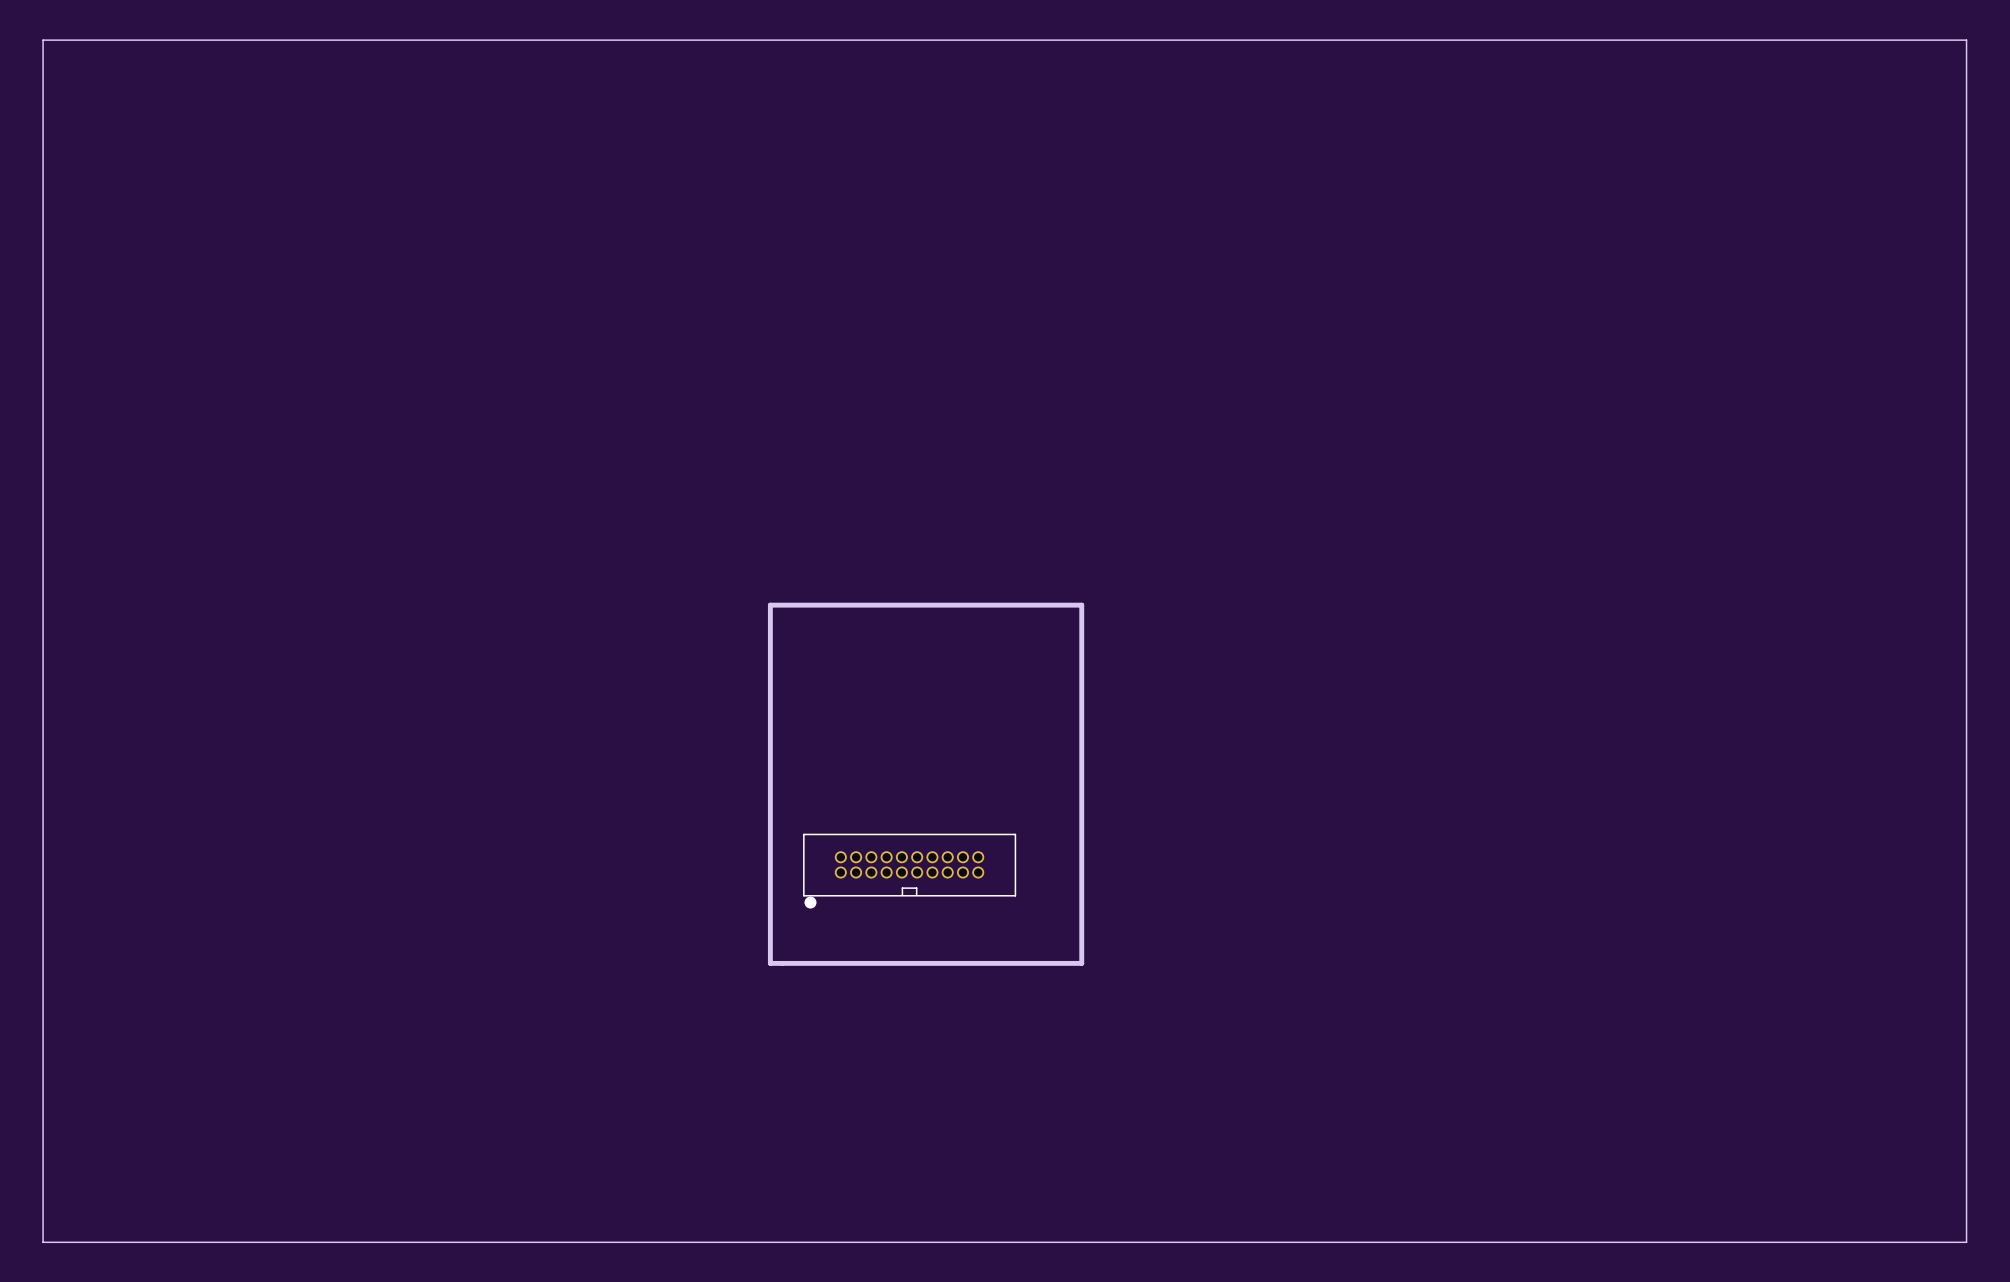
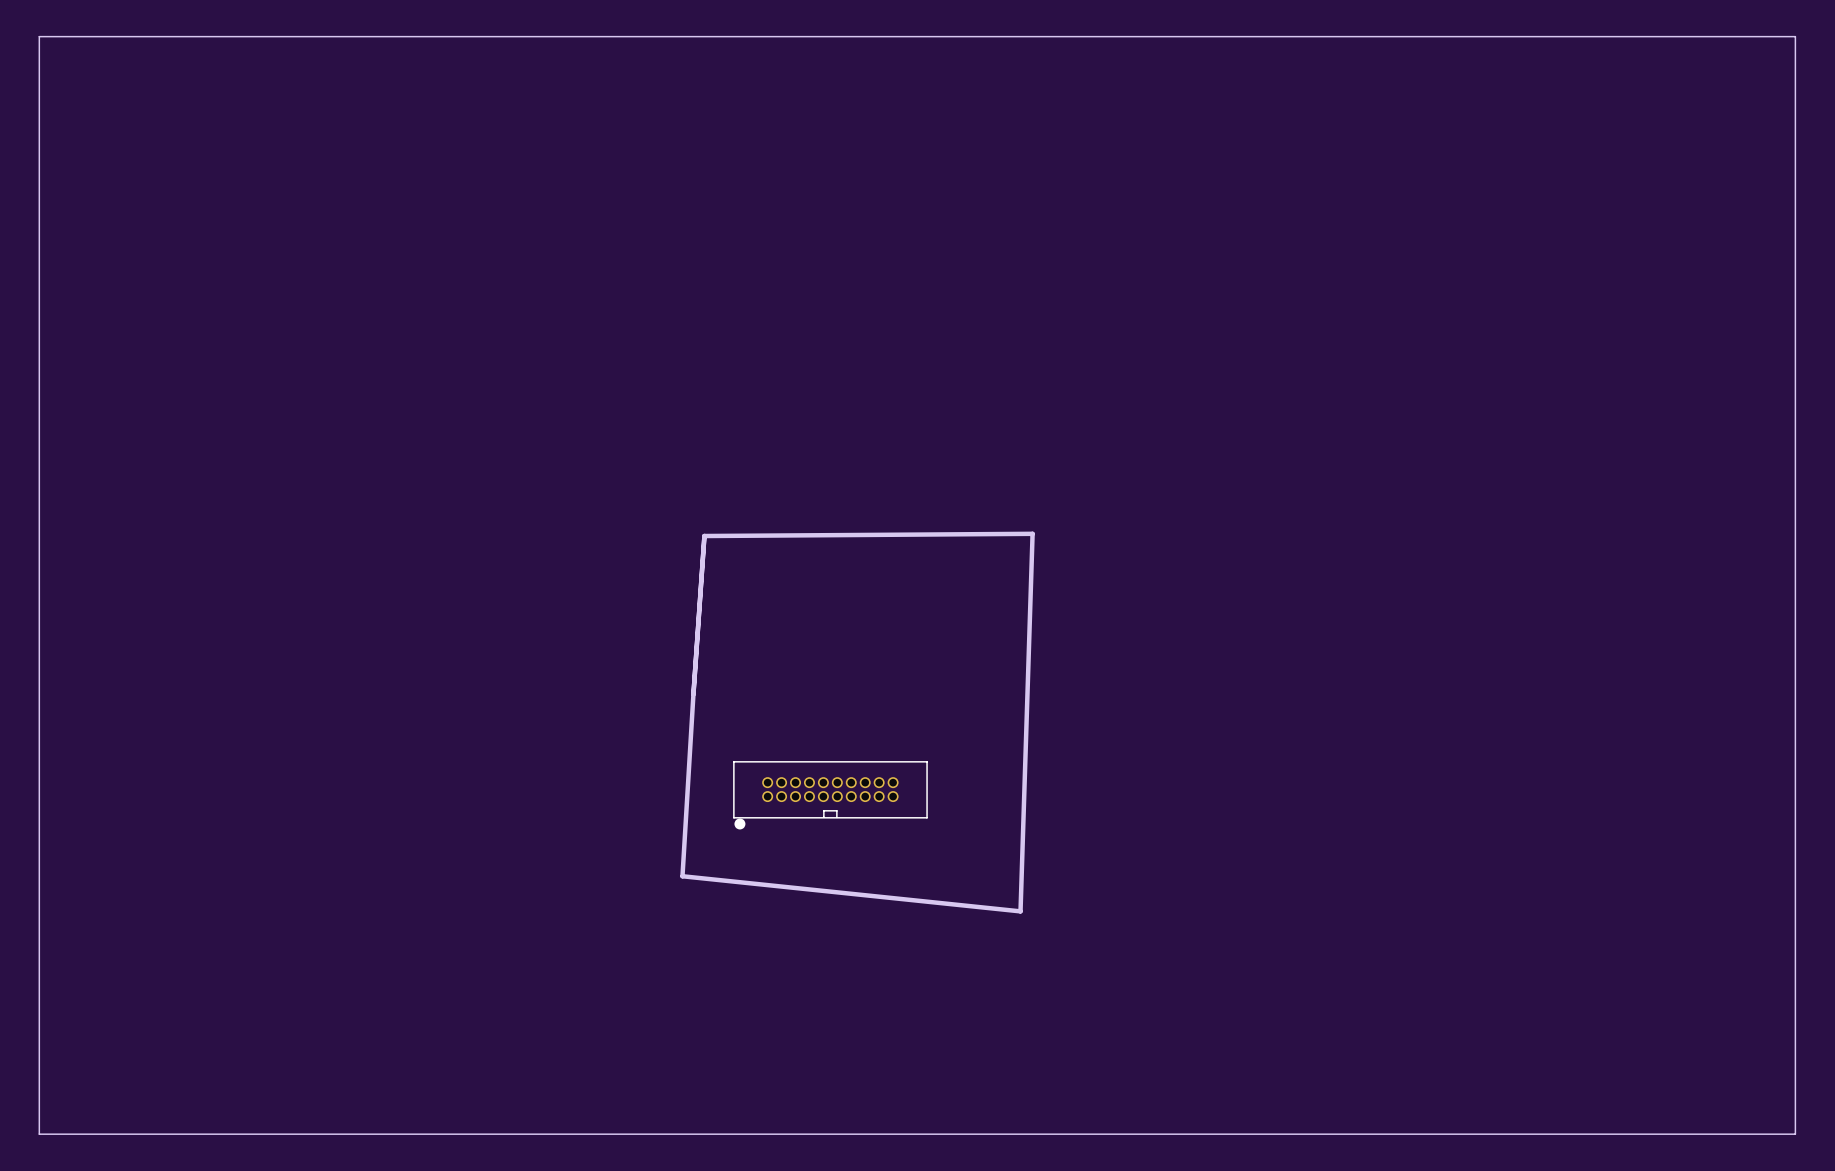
board edge: (770, 605) (1081, 605) (1081, 963) (770, 963) (770, 605) -> (1032, 533) (704, 536) (682, 876) (1020, 911) (1032, 533)

